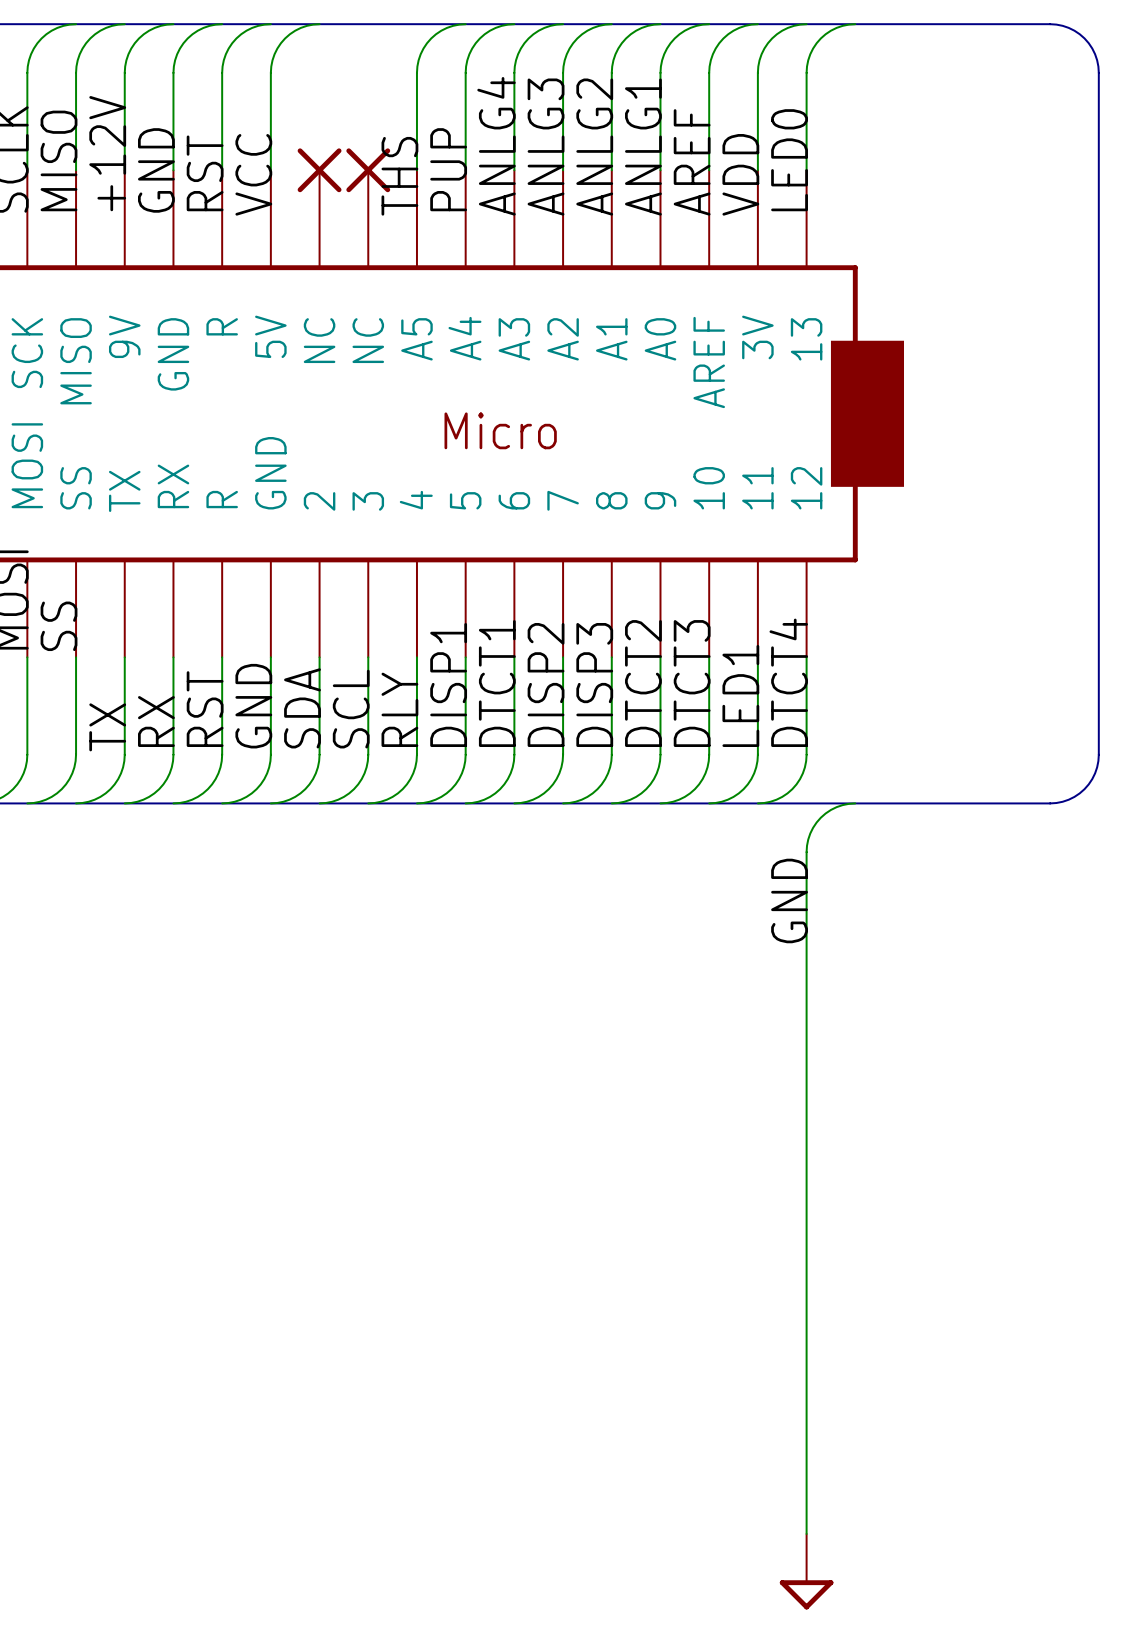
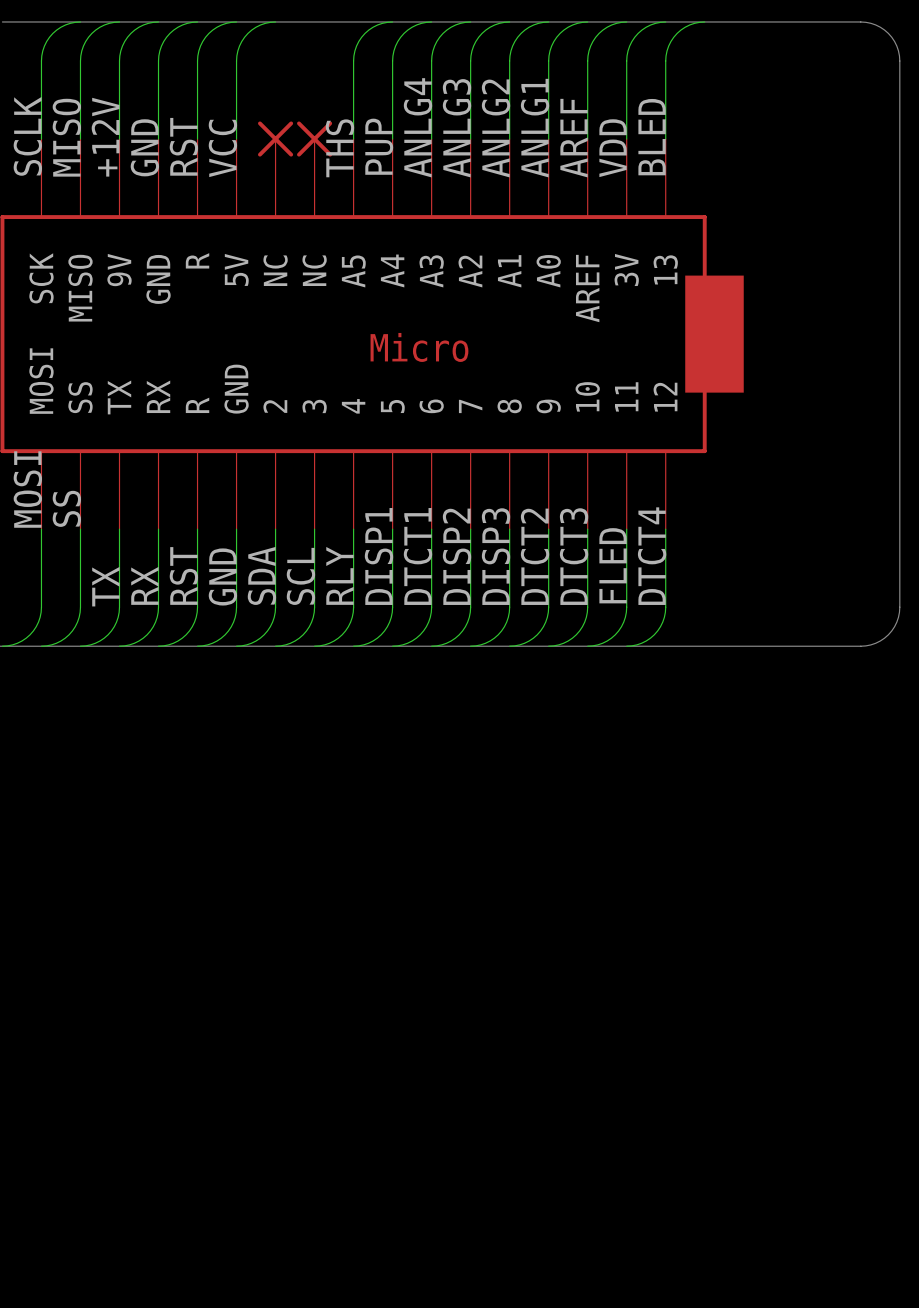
label: LED0 (789, 160) -> BLED (652, 137)
label: LED1 (740, 695) -> FLED (613, 565)
wire: (855, 803) (836, 807) (820, 817) (810, 833) (807, 845) (806, 1533) -> none
label: GND (789, 900) -> none
power symbol: (806, 1571) -> none

